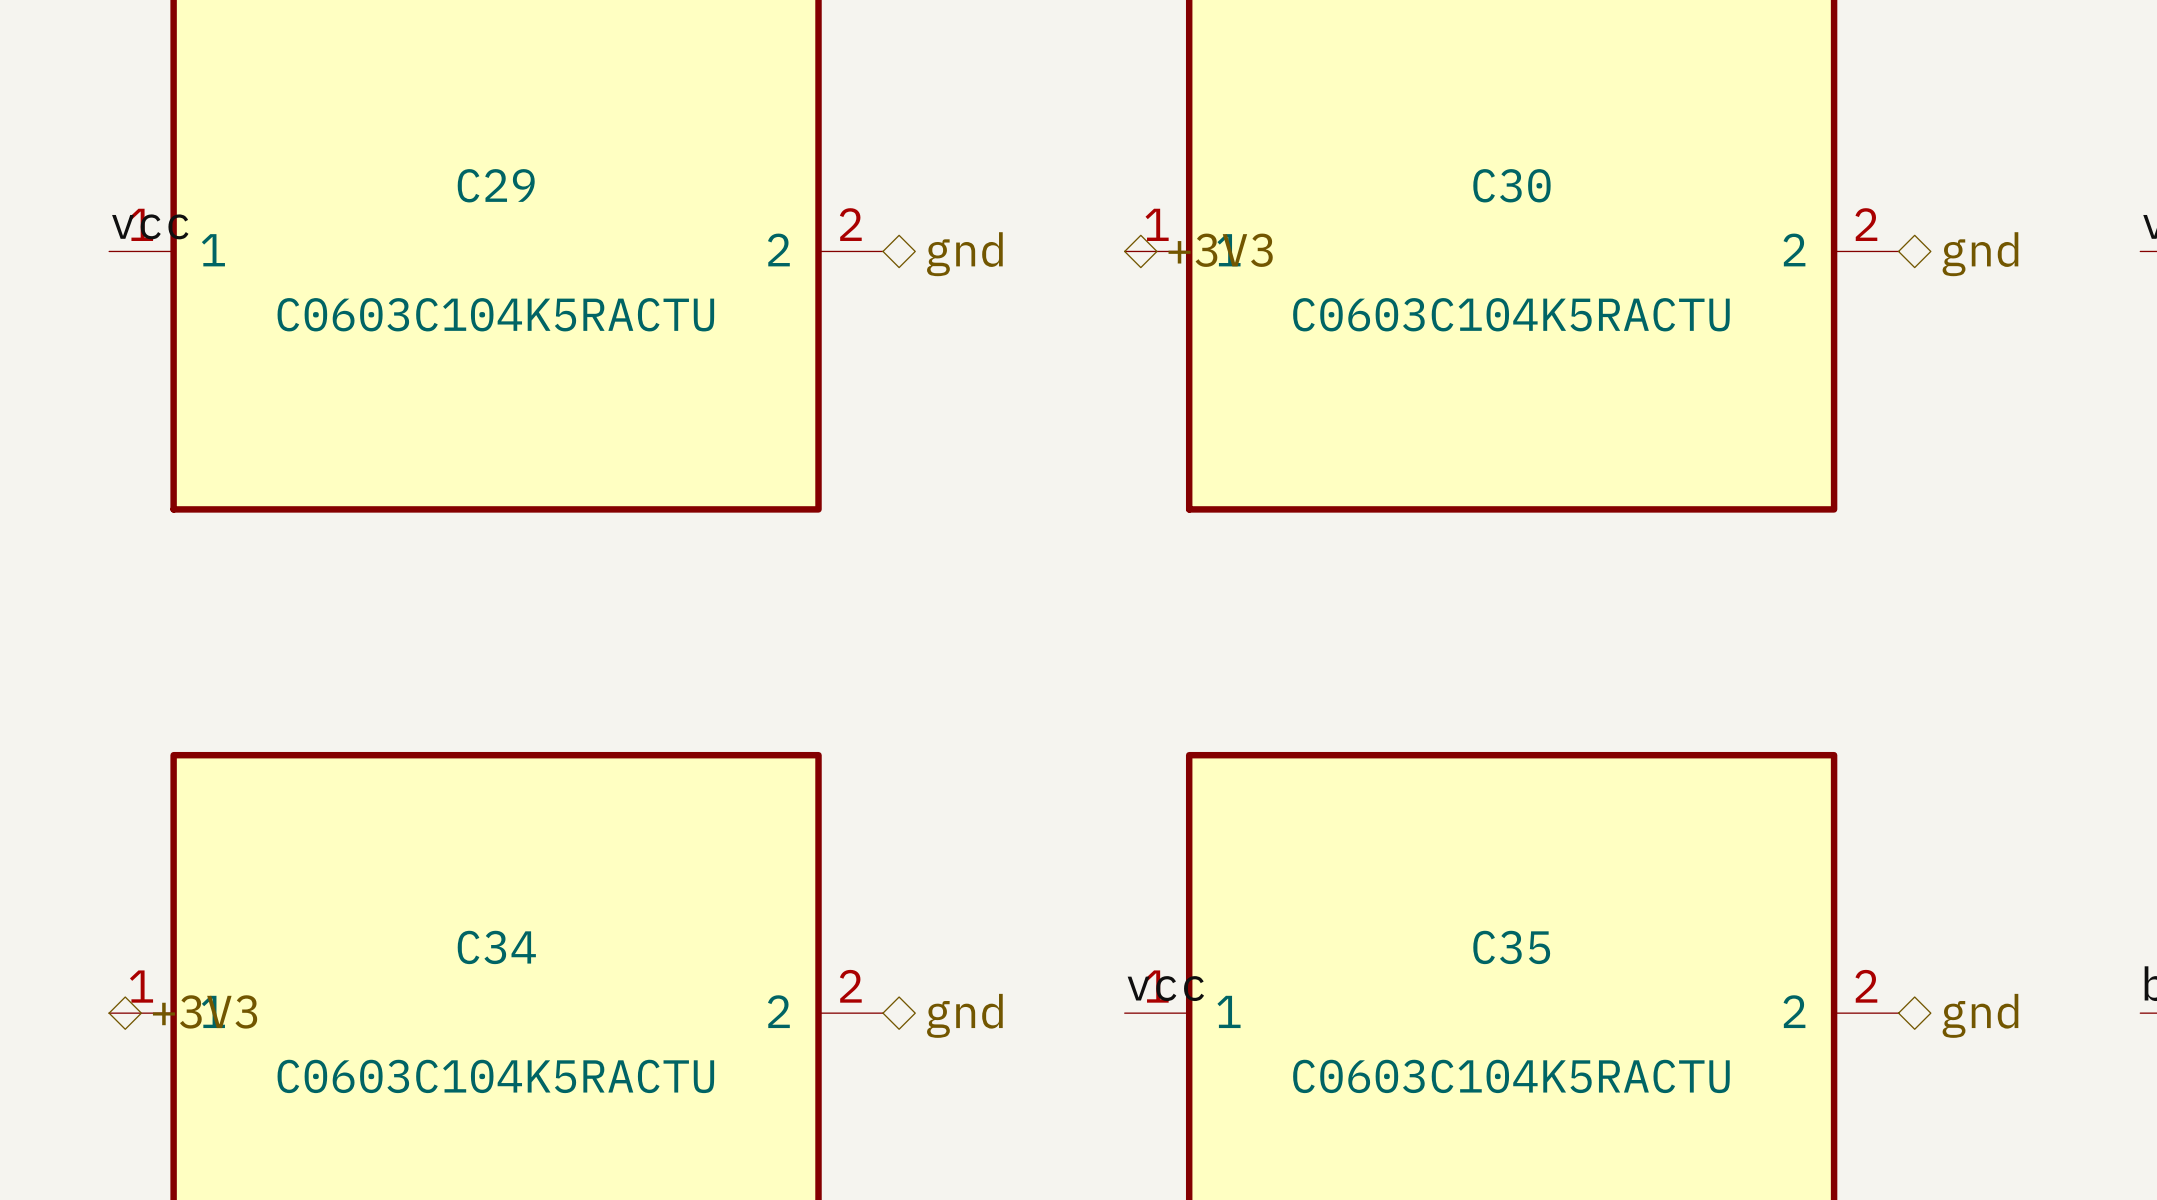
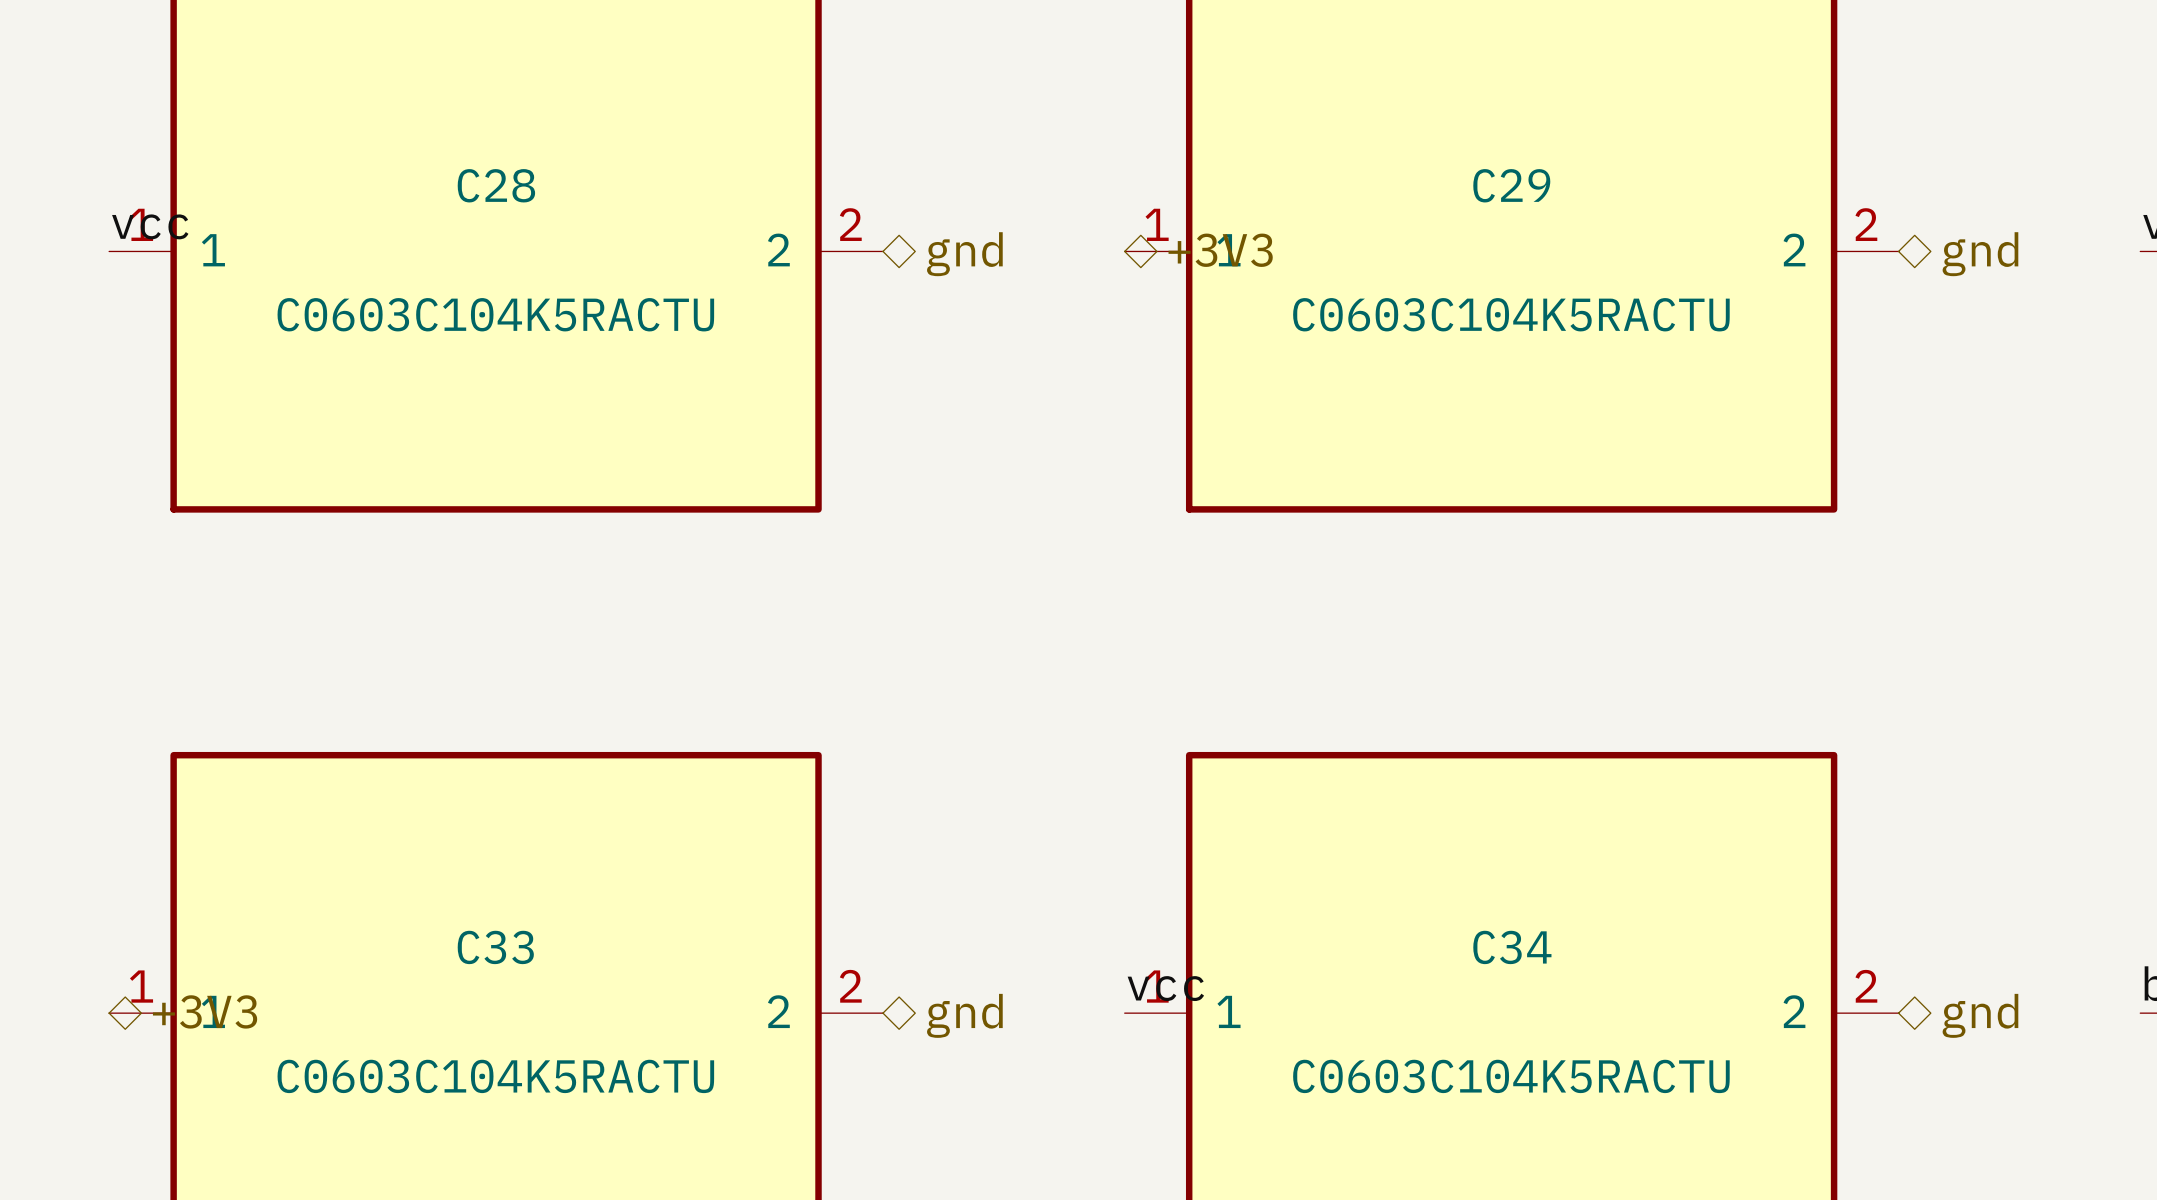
C29 name: C29 (496, 185) -> C28 (496, 185)
C30 name: C30 (1511, 185) -> C29 (1511, 185)
C34 name: C34 (496, 947) -> C33 (495, 947)
C35 name: C35 (1511, 947) -> C34 (1512, 947)

